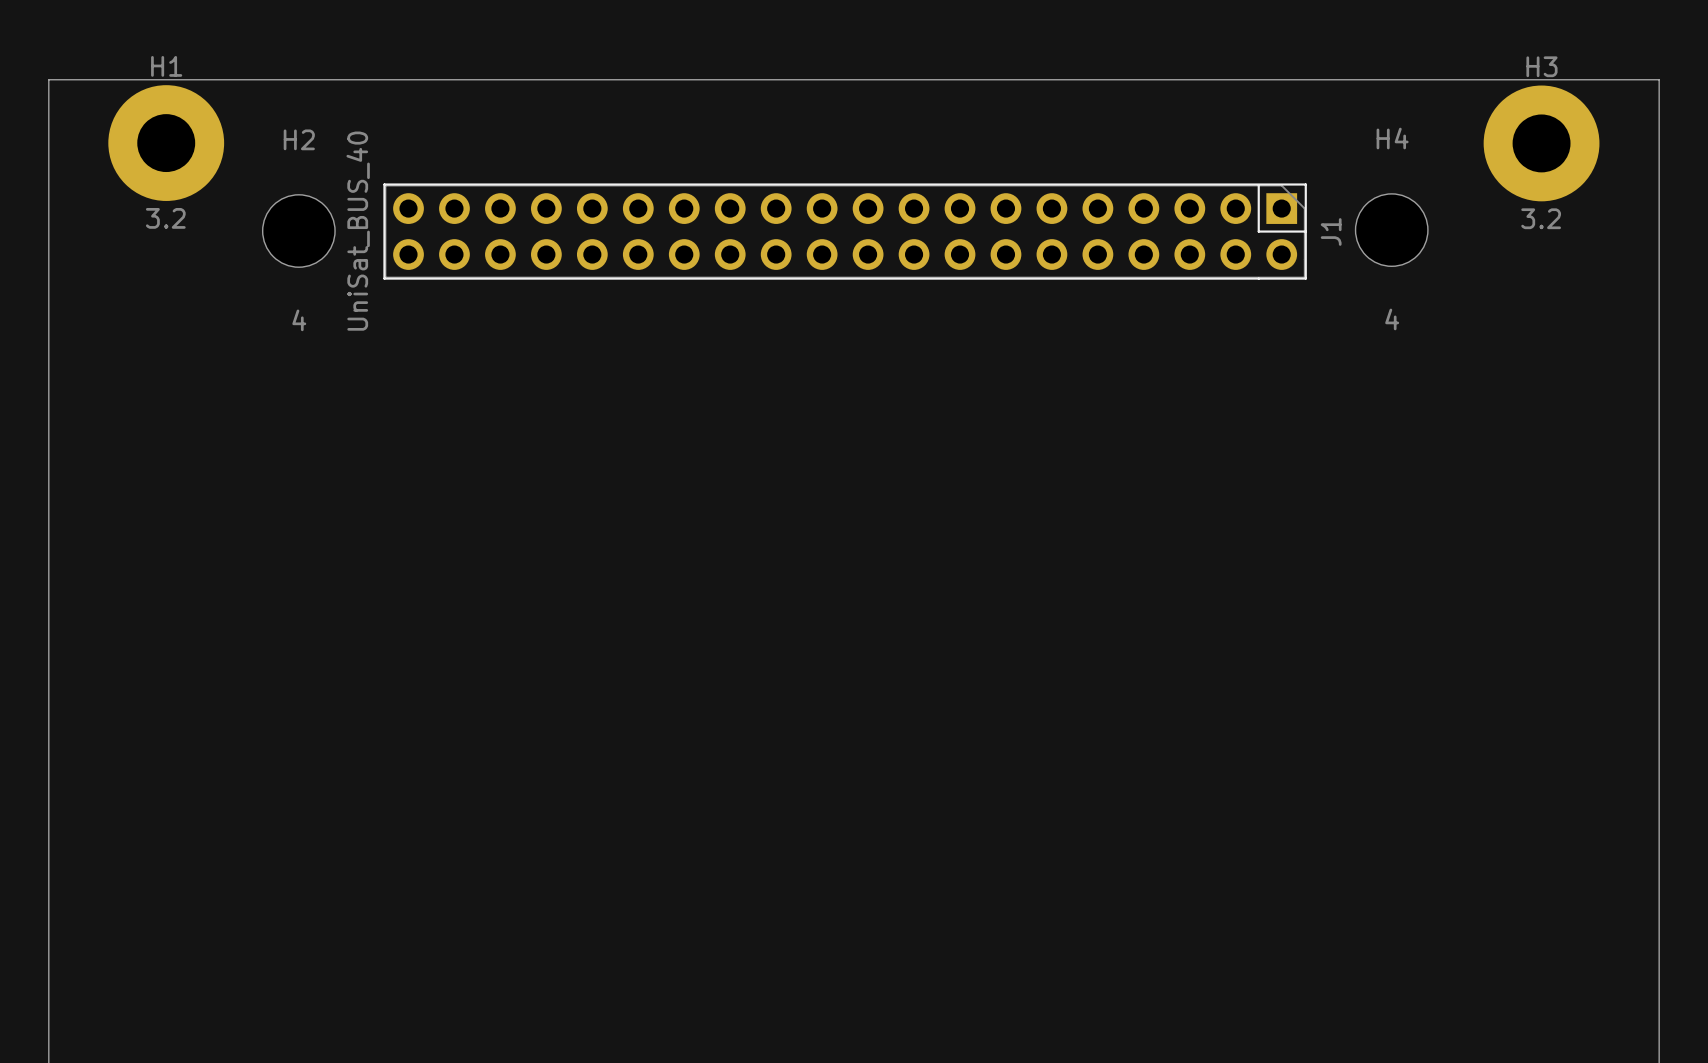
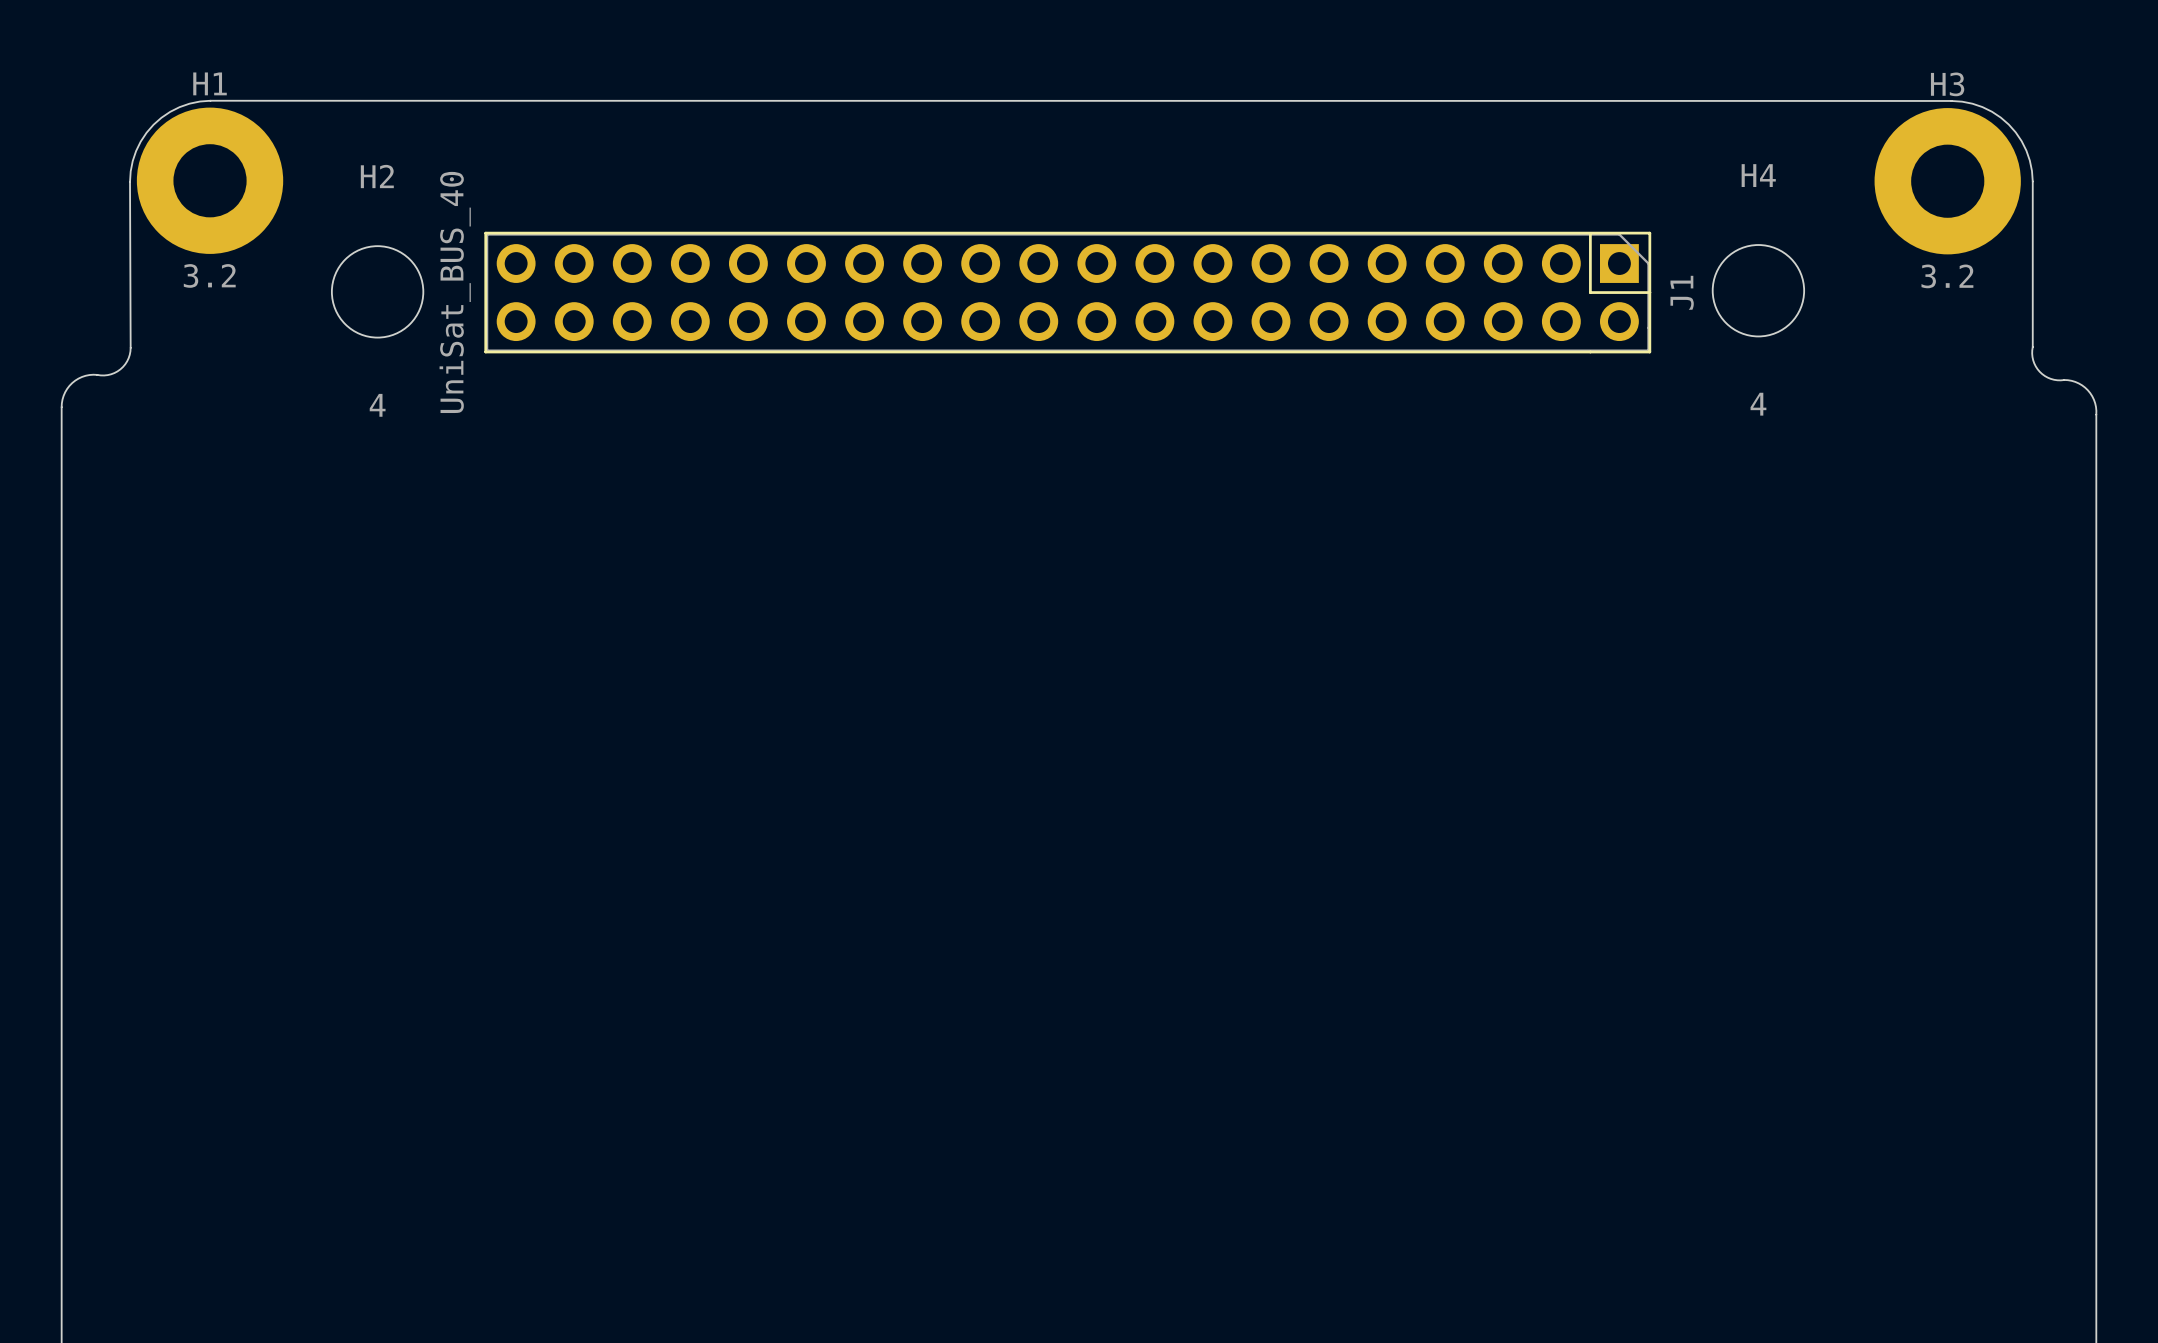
board edge: none -> (2064, 379) (2075, 381) (2087, 390) (2093, 399) (2096, 414)
board edge: (48, 322) (48, 79) (1659, 79) (1659, 328) -> (61, 407) (65, 392) (75, 380) (89, 375) (104, 375) (114, 373) (123, 366) (129, 354) (130, 181) (136, 151) (153, 124) (170, 111) (189, 103) (210, 100) (1962, 101) (1982, 107) (2000, 117) (2015, 132) (2026, 150) (2032, 181) (2032, 356) (2035, 366) (2042, 374) (2054, 379) (2064, 380)

